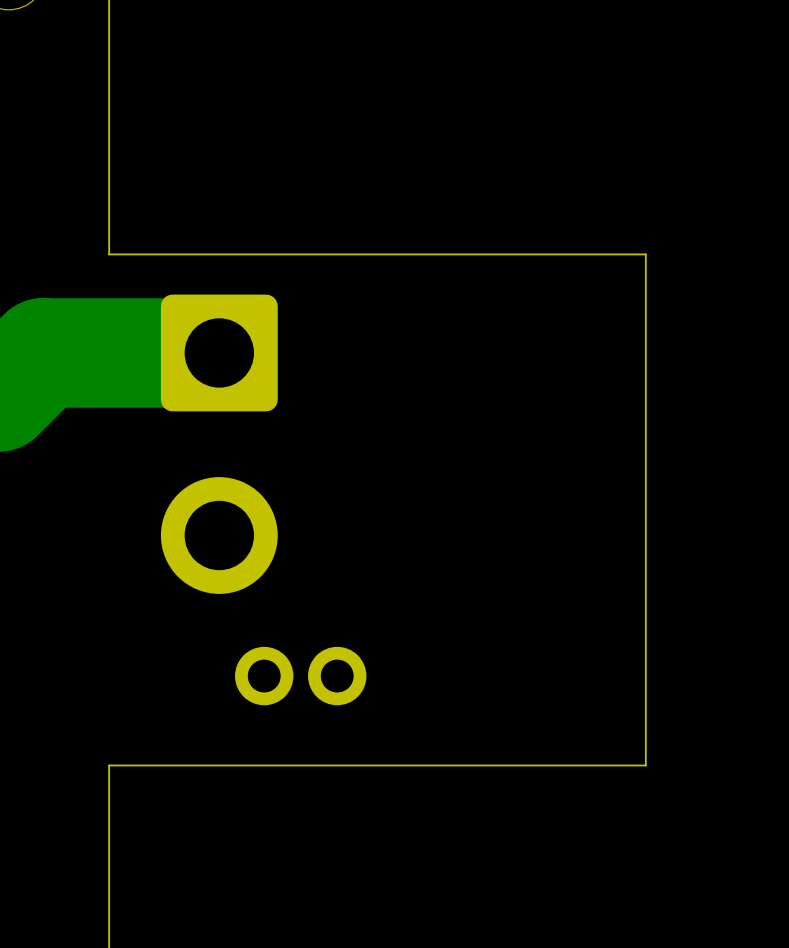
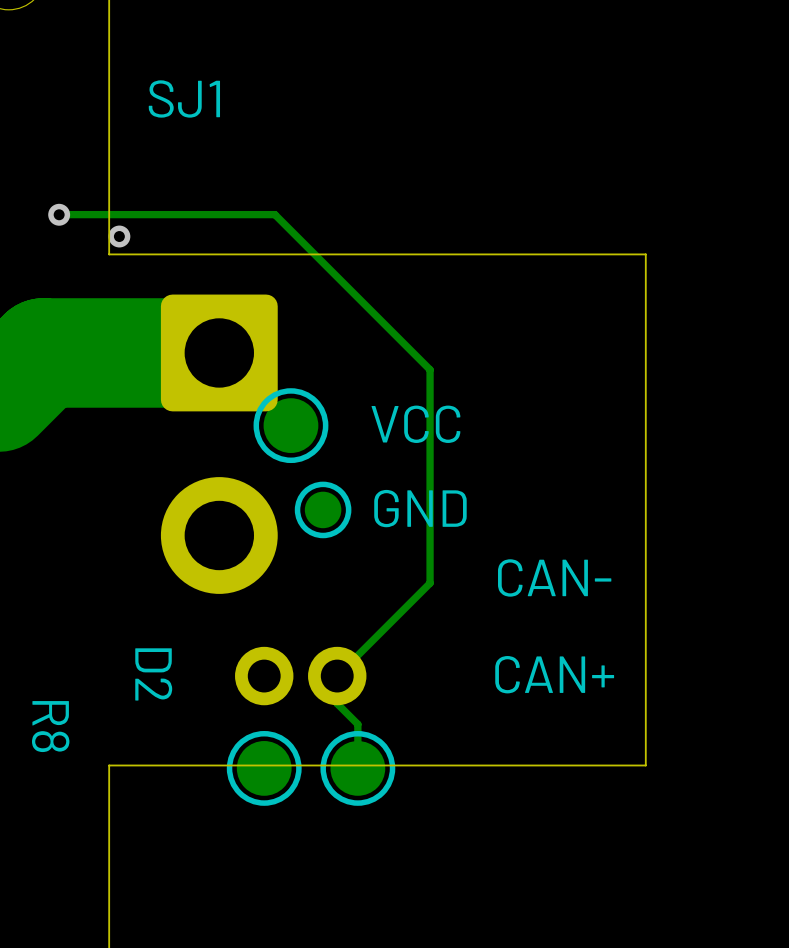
SJ1: none -> (184, 98)
via: none -> (59, 214)
track: none -> (67, 214) (274, 214) (430, 369) (430, 583) (337, 676) (337, 703) (357, 724) (357, 768)
via: none -> (119, 236)
text: none -> VCC (415, 424)
part: none -> (290, 425)
text: none -> GND (420, 508)
part: none -> (323, 509)
text: none -> CAN- (554, 577)
D2: none -> (153, 674)
text: none -> CAN+ (554, 674)
R8: none -> (50, 726)
part: none -> (264, 768)
part: none -> (357, 768)

